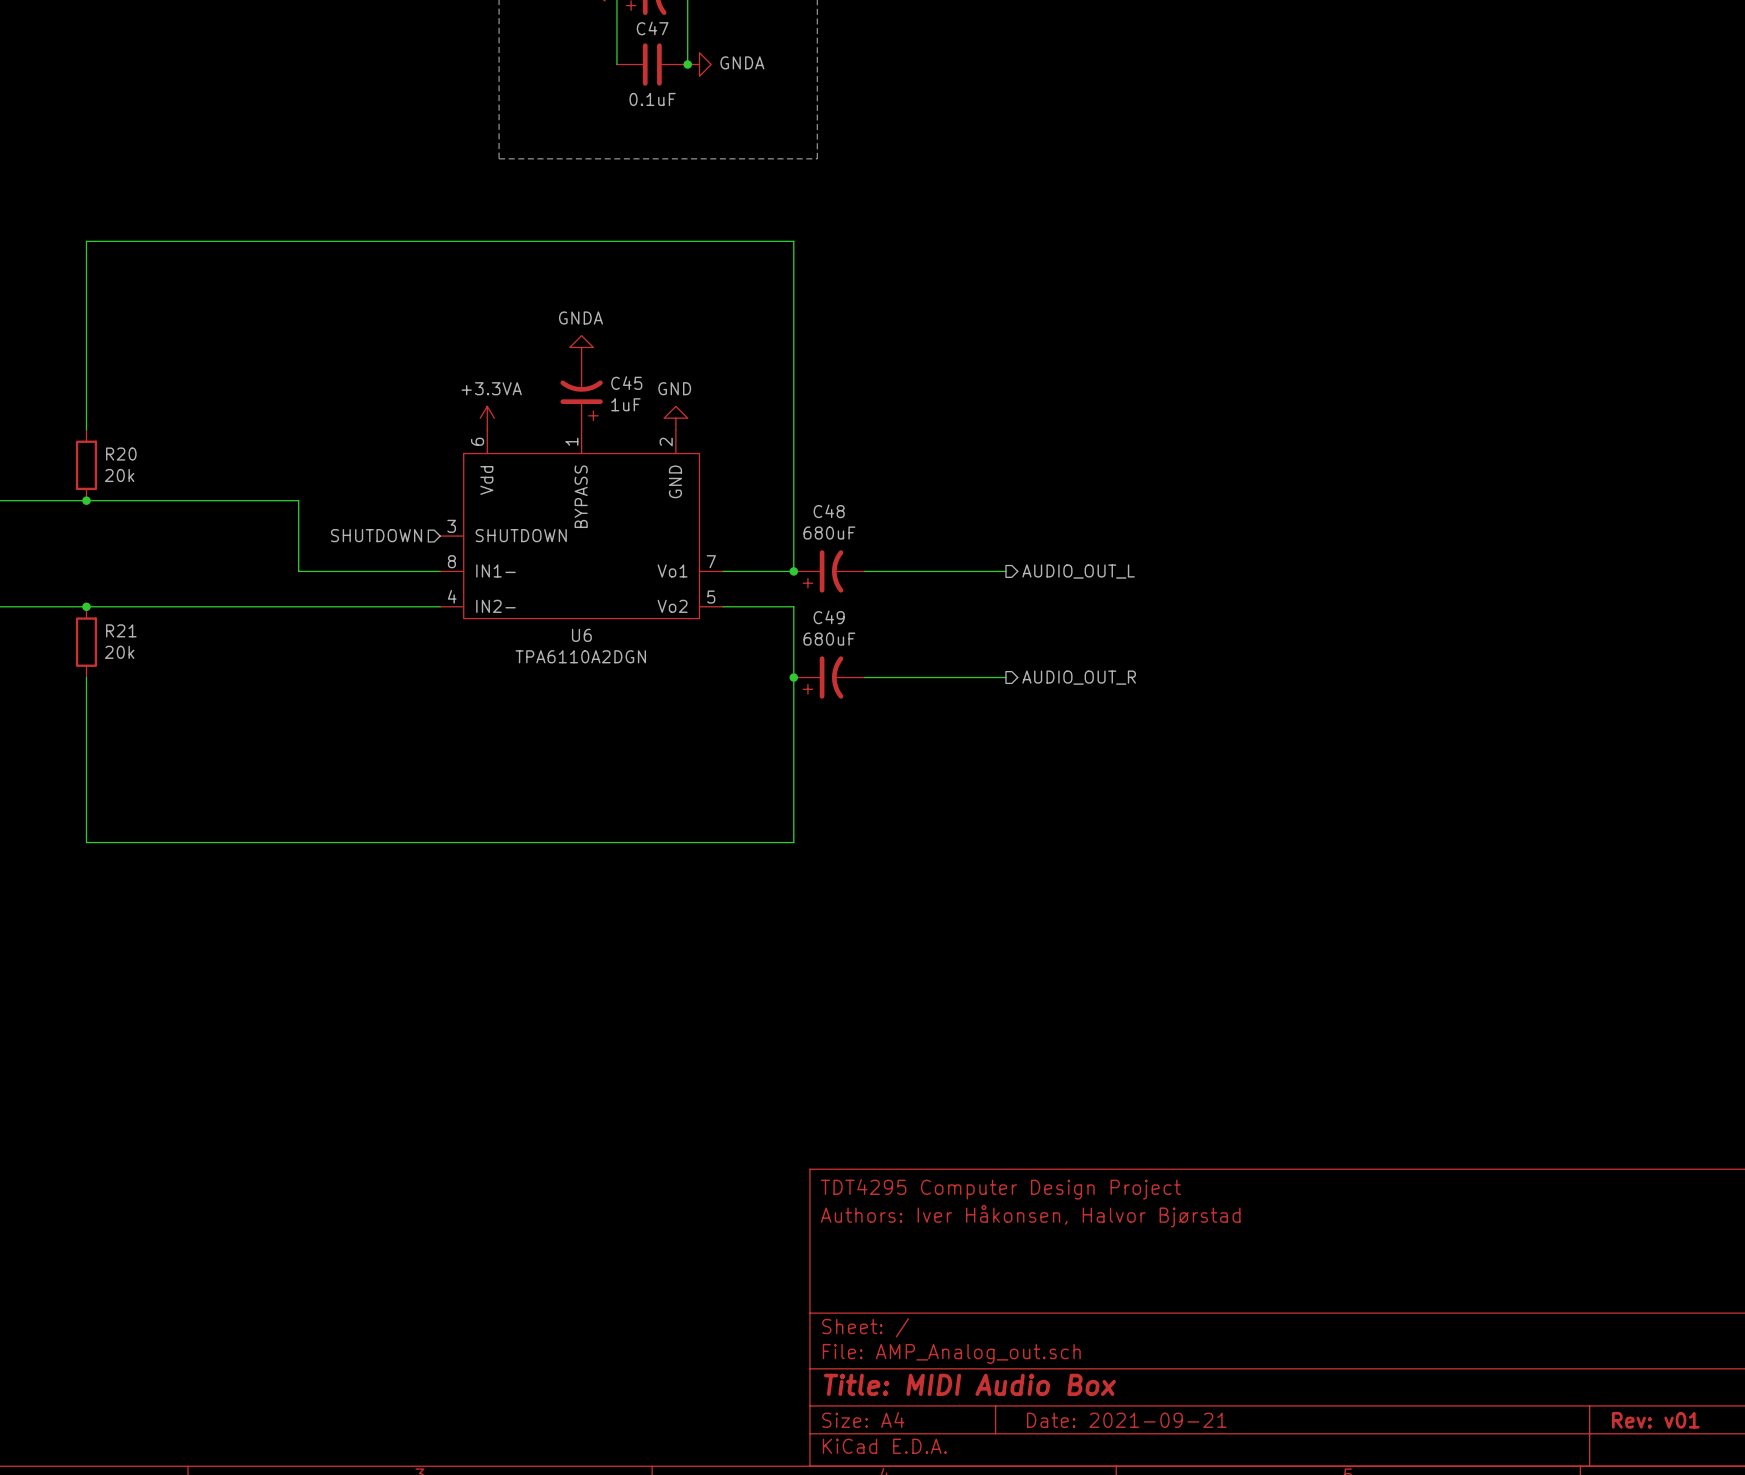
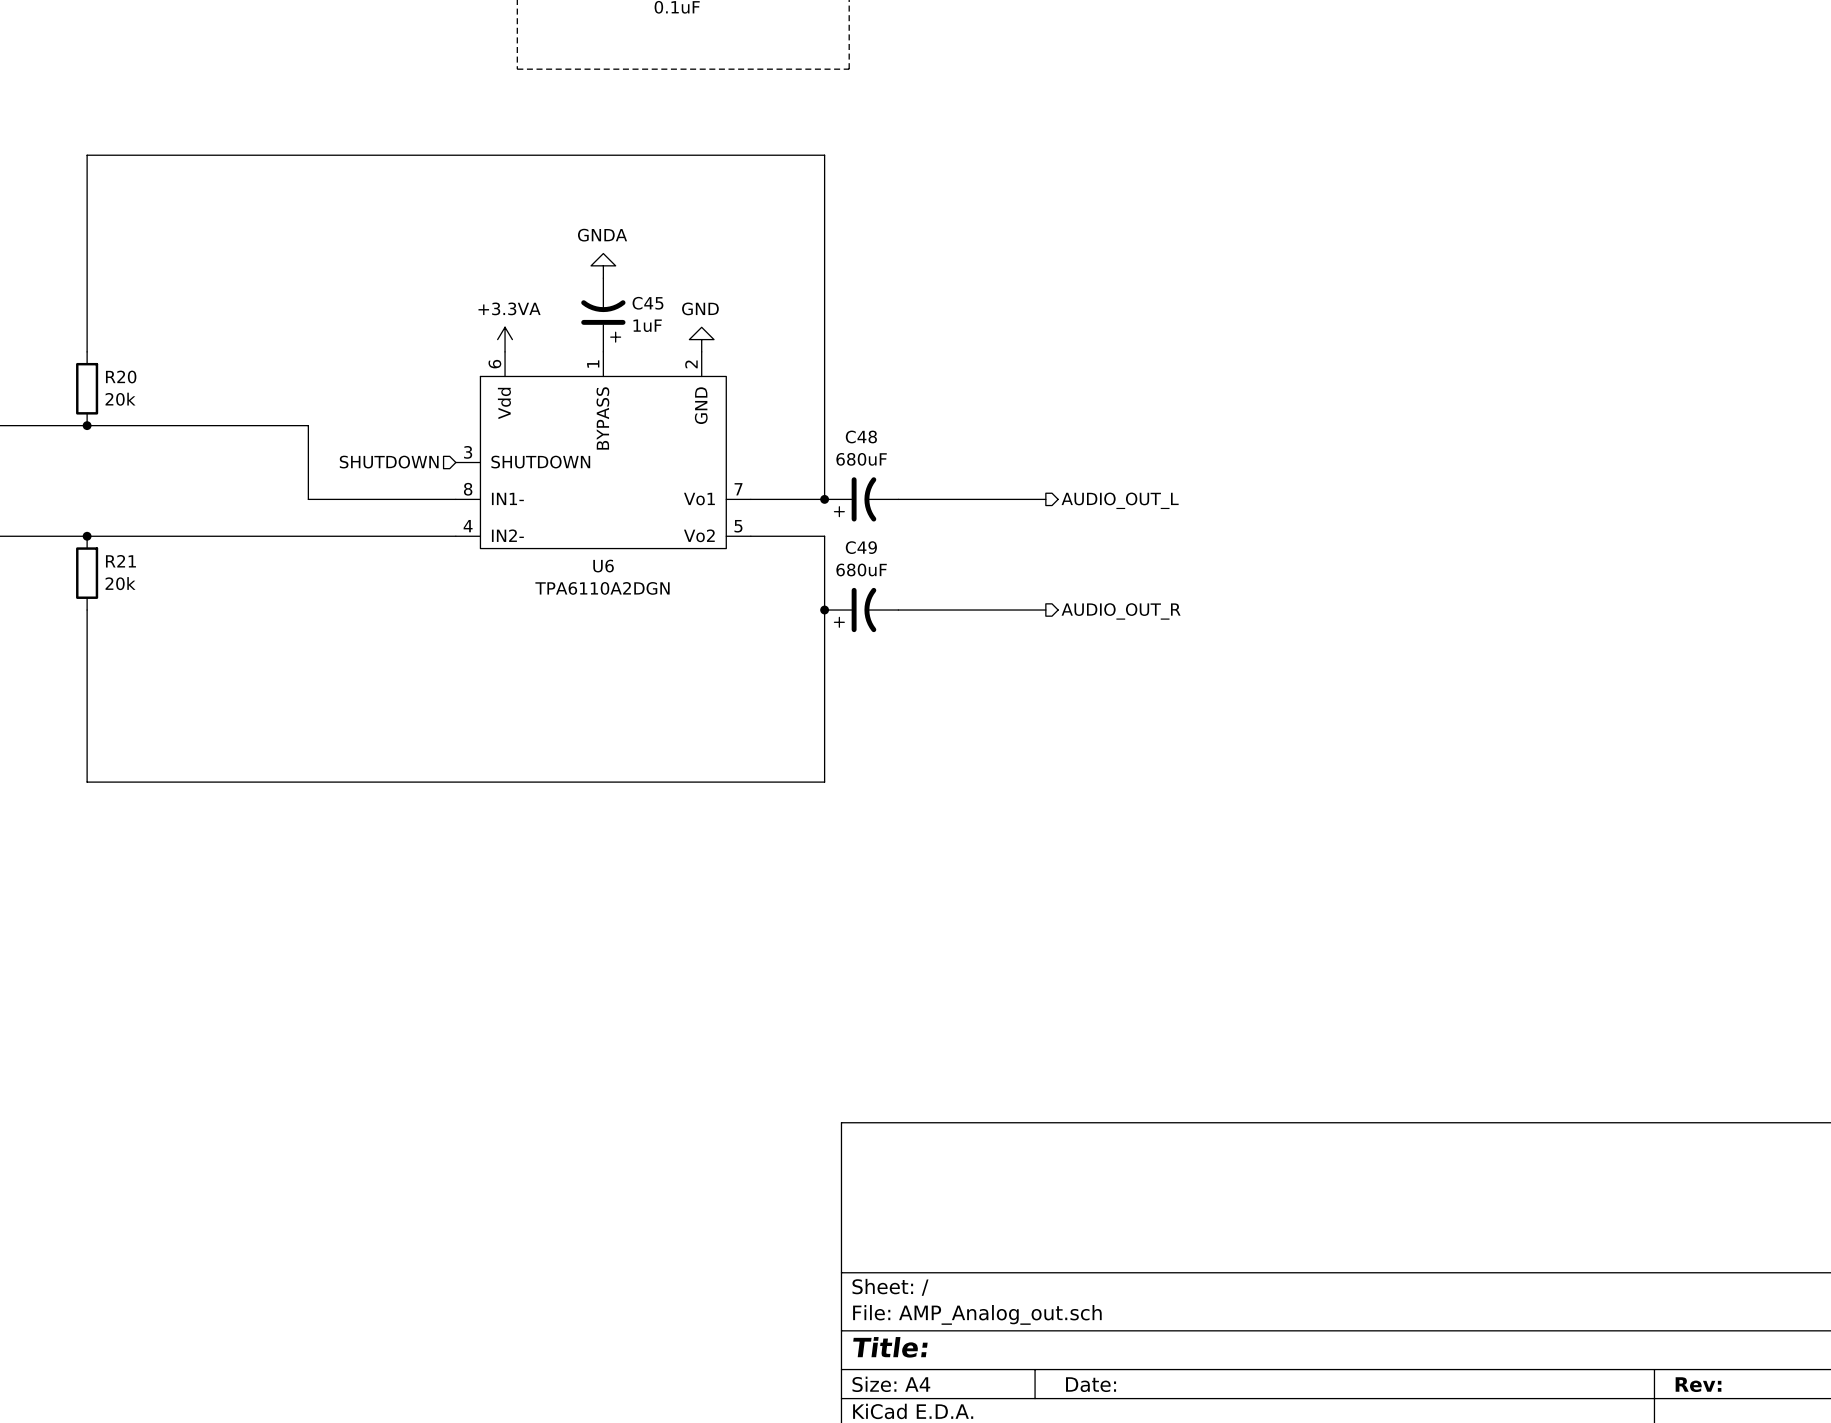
title block: TDT4295 Computer Design Project (1000, 1189) -> none
title block: Authors: Iver Håkonsen, Halvor Bjørstad (1030, 1216) -> none
title block: Title: MIDI Audio Box (969, 1384) -> Title: (890, 1347)
title block: Date: 2021-09-21 (1126, 1420) -> Date: (1091, 1384)
title block: Rev: v01 (1655, 1420) -> Rev: (1698, 1384)

